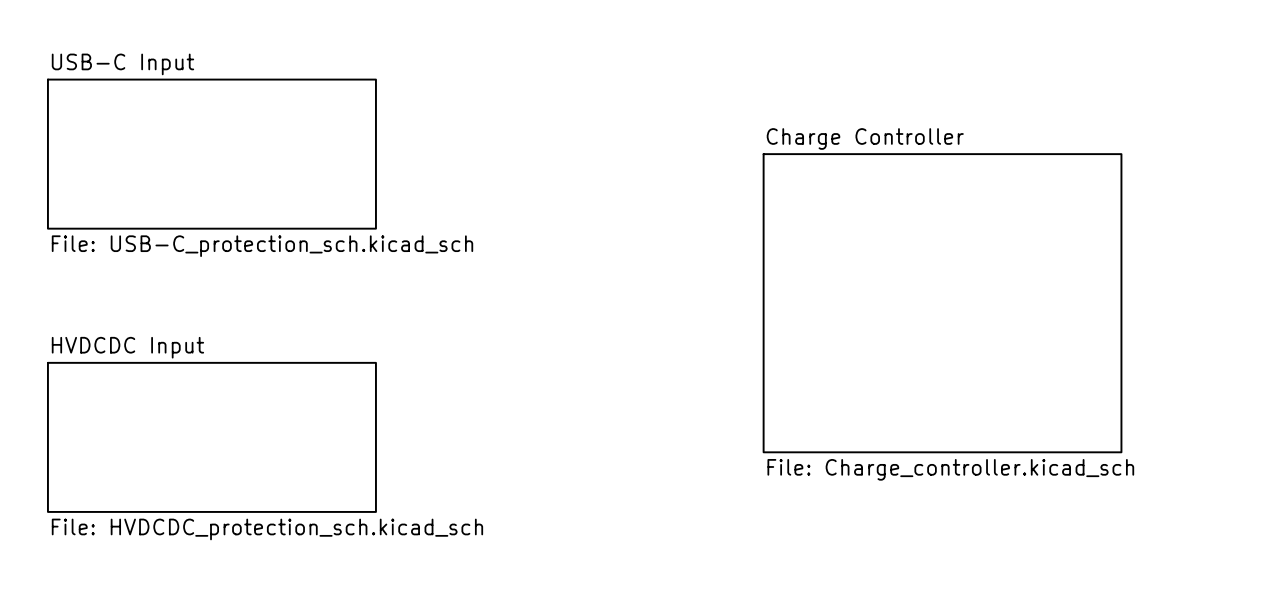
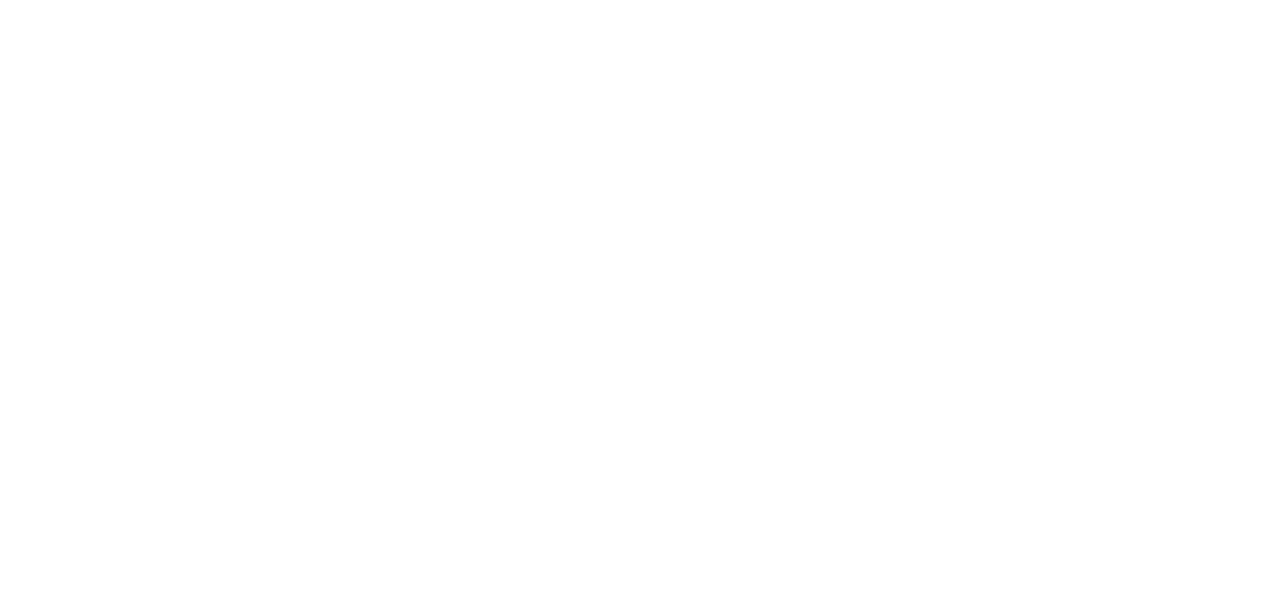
sheet USB-C Input: File: USB-C_protection_sch.kicad_sch (211, 154) -> none
sheet Charge Controller: File: Charge_controller.kicad_sch (942, 303) -> none
sheet HVDCDC Input: File: HVDCDC_protection_sch.kicad_sch (211, 437) -> none

